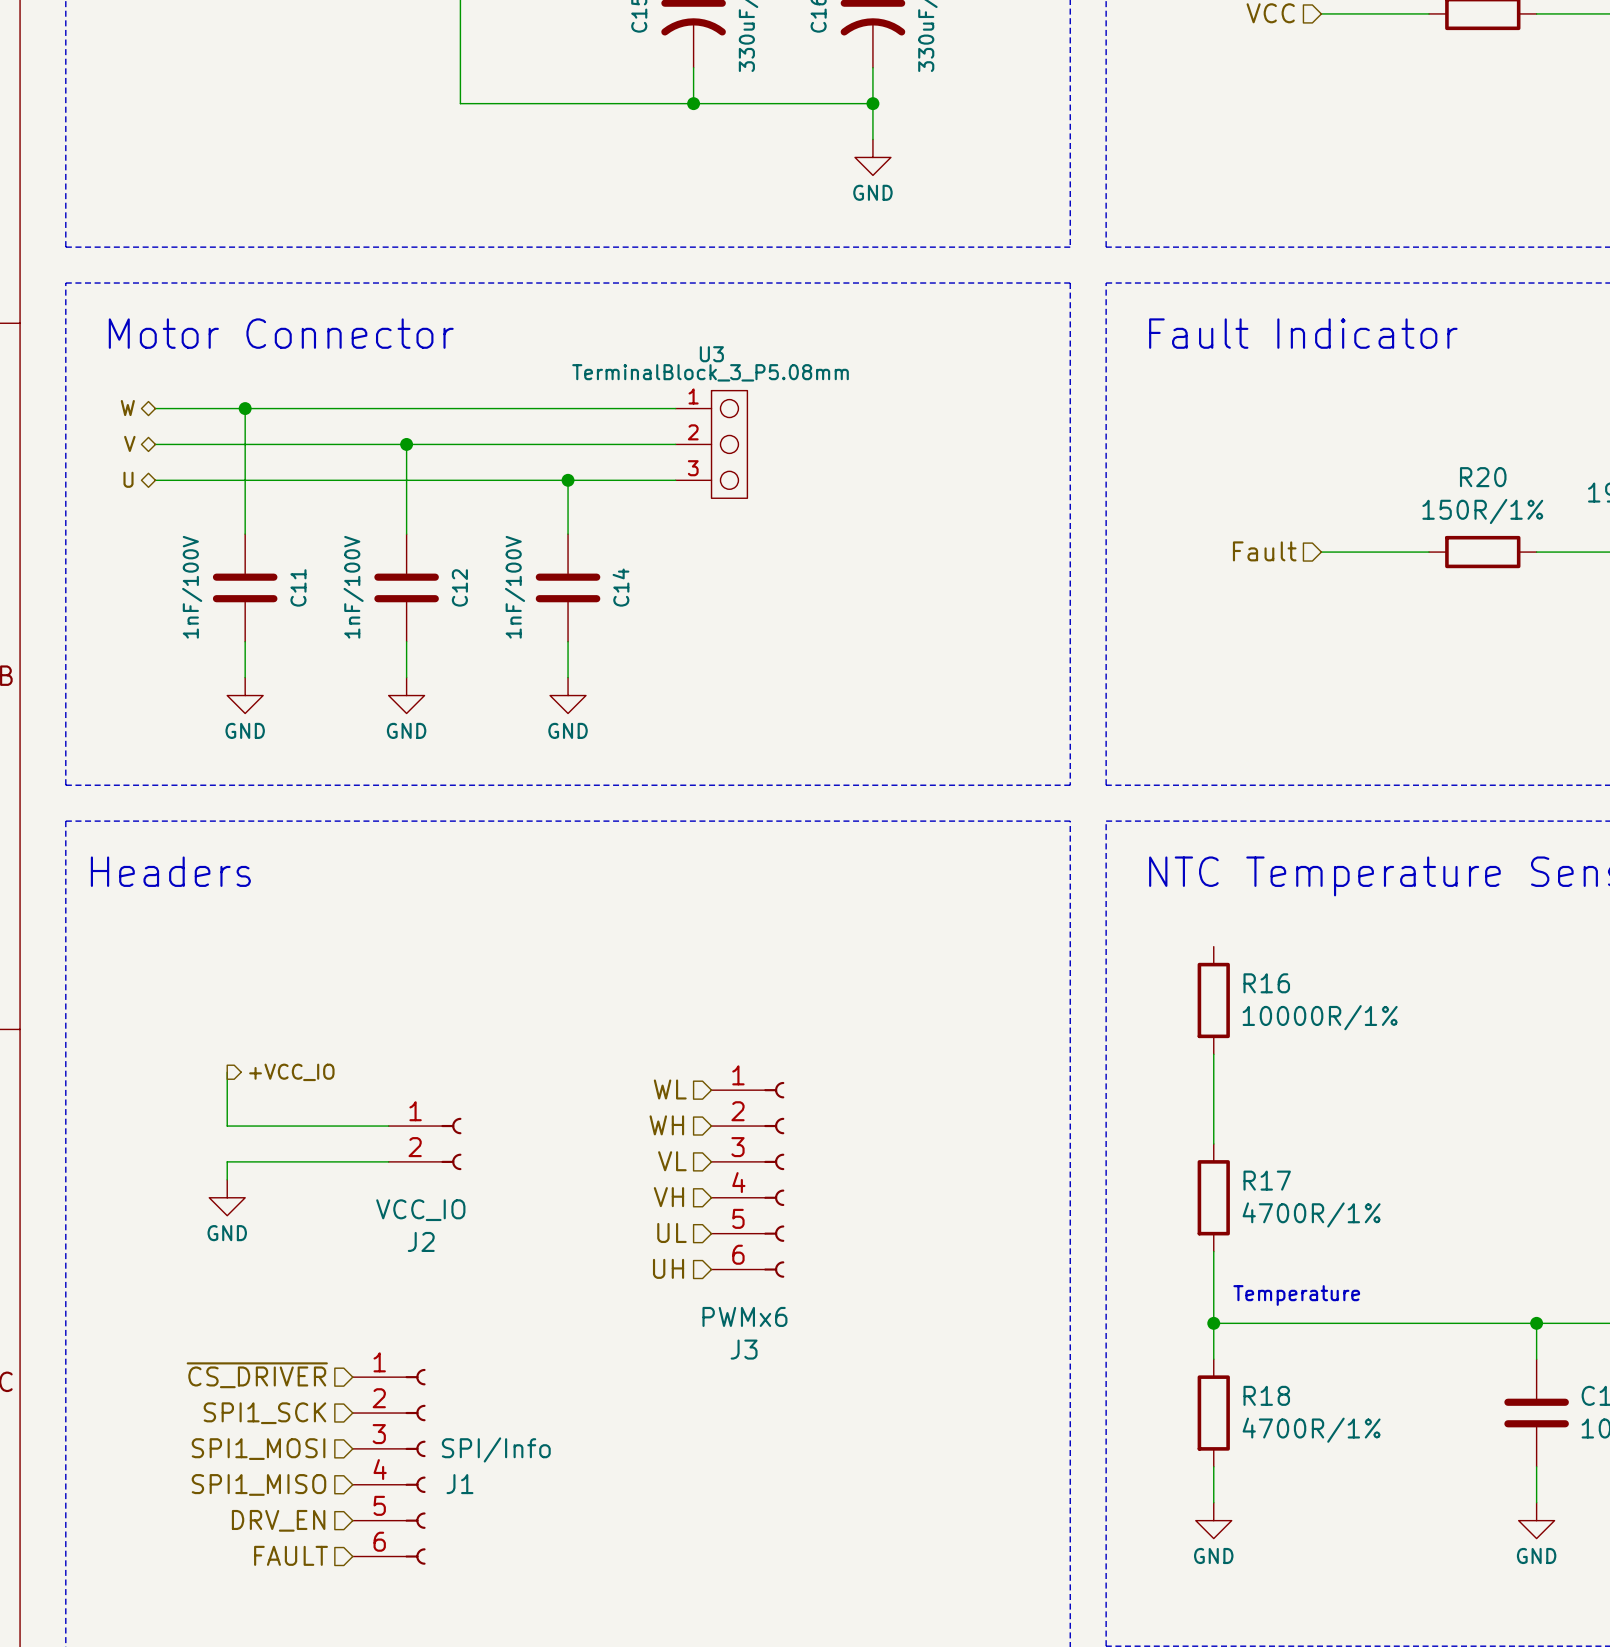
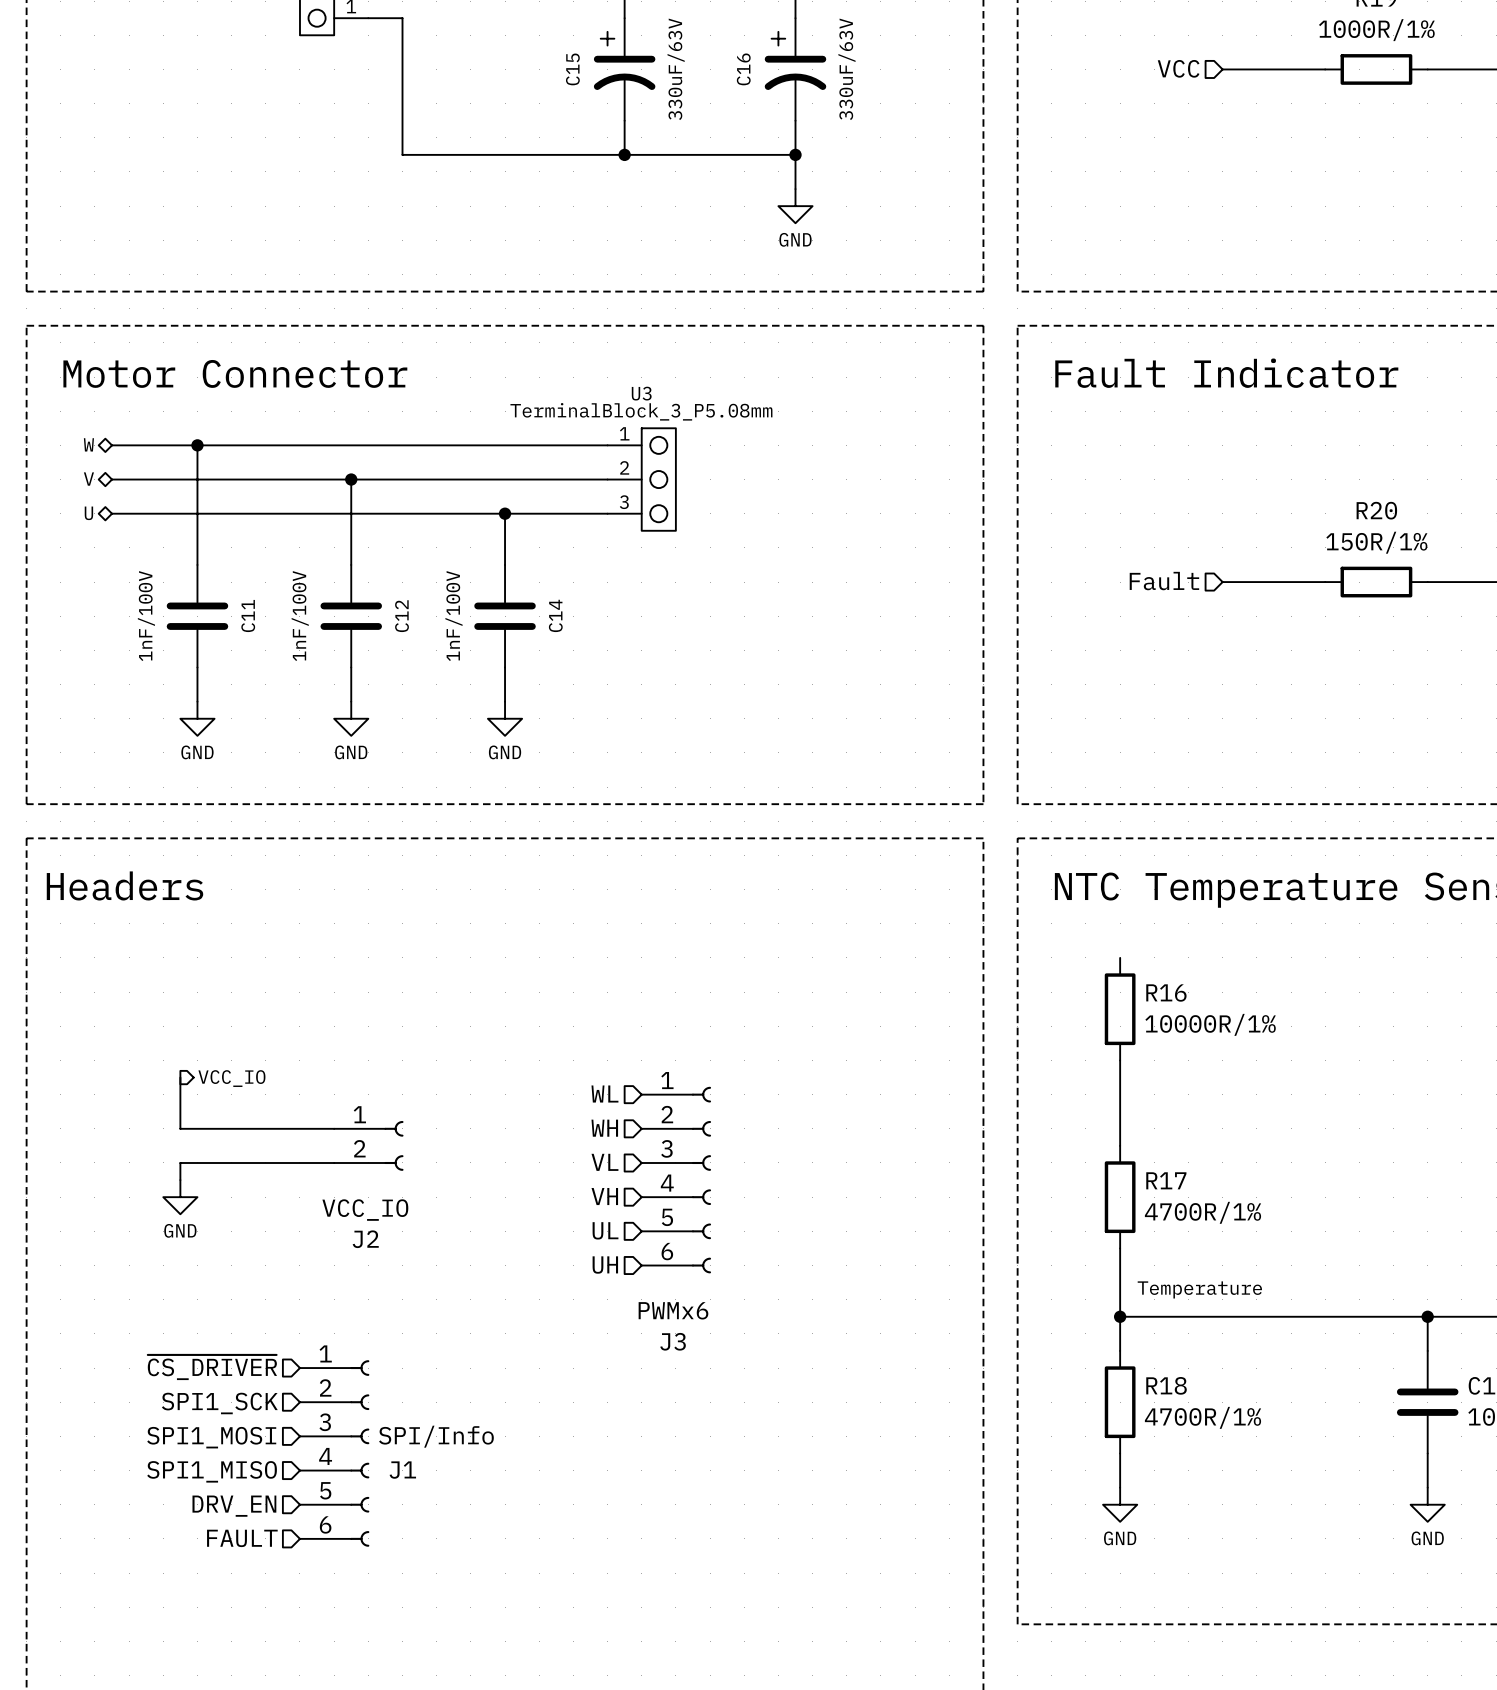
hierarchical label: +VCC_IO (291, 1072) -> VCC_IO (231, 1078)

